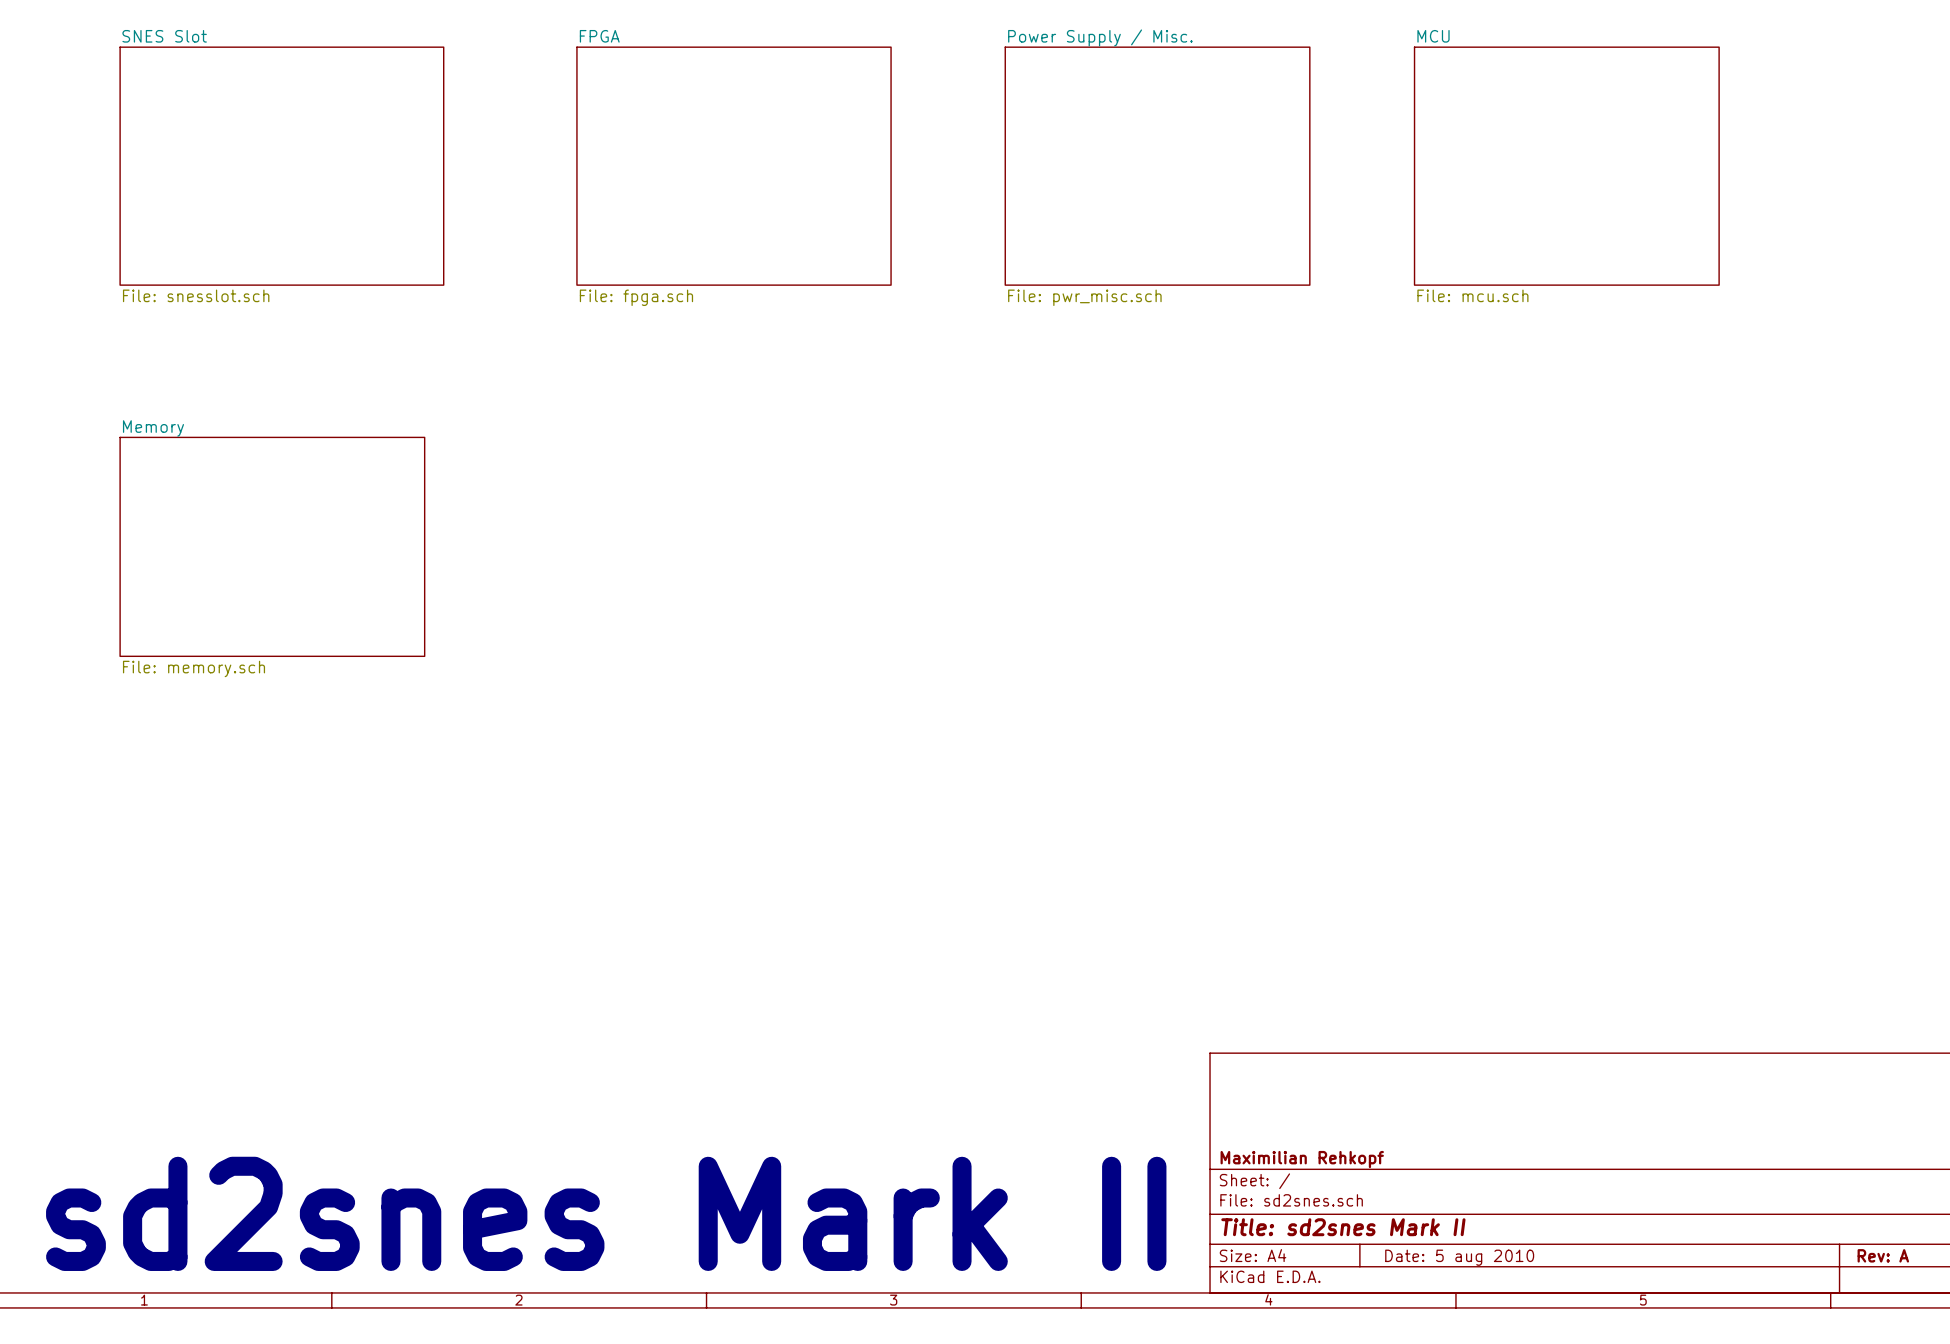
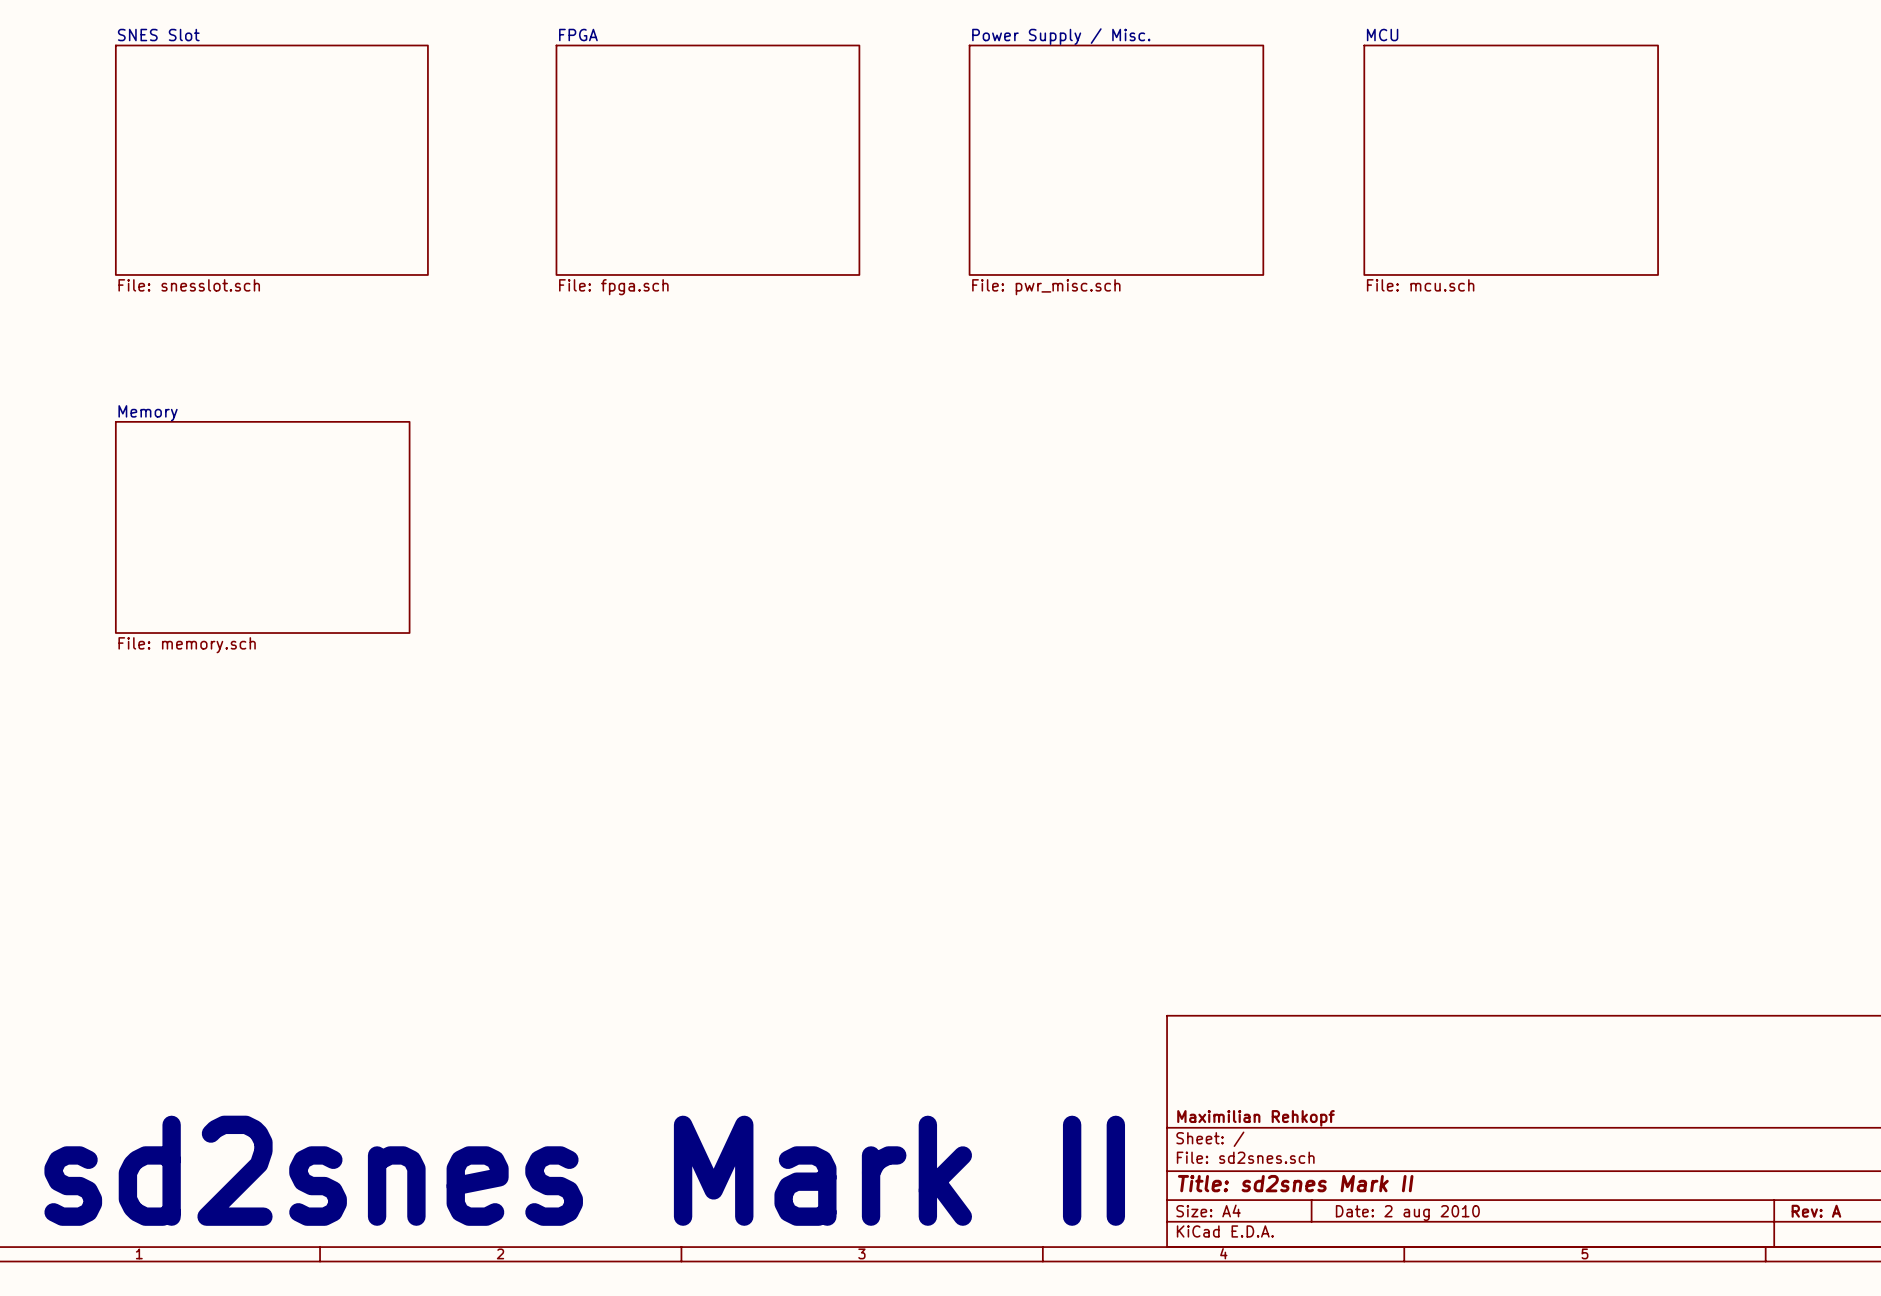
title block: Date: 5 aug 2010 (1459, 1257) -> Date: 2 aug 2010 (1407, 1213)

